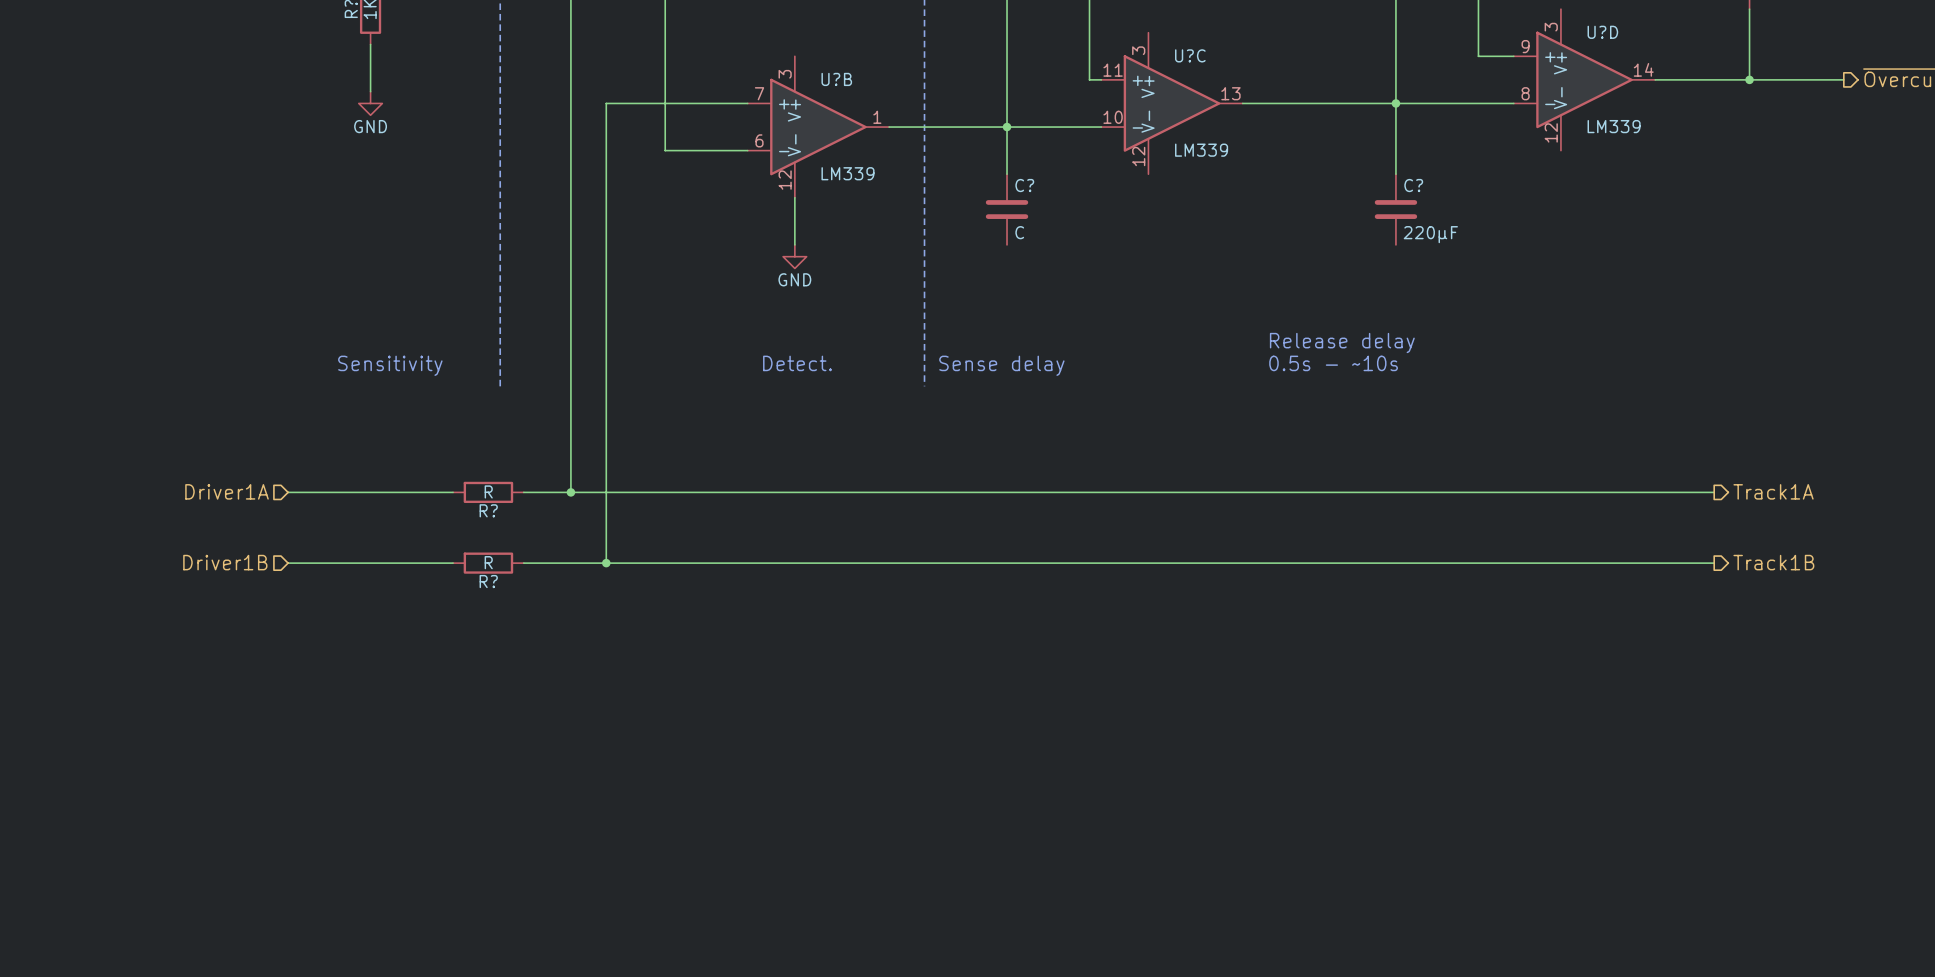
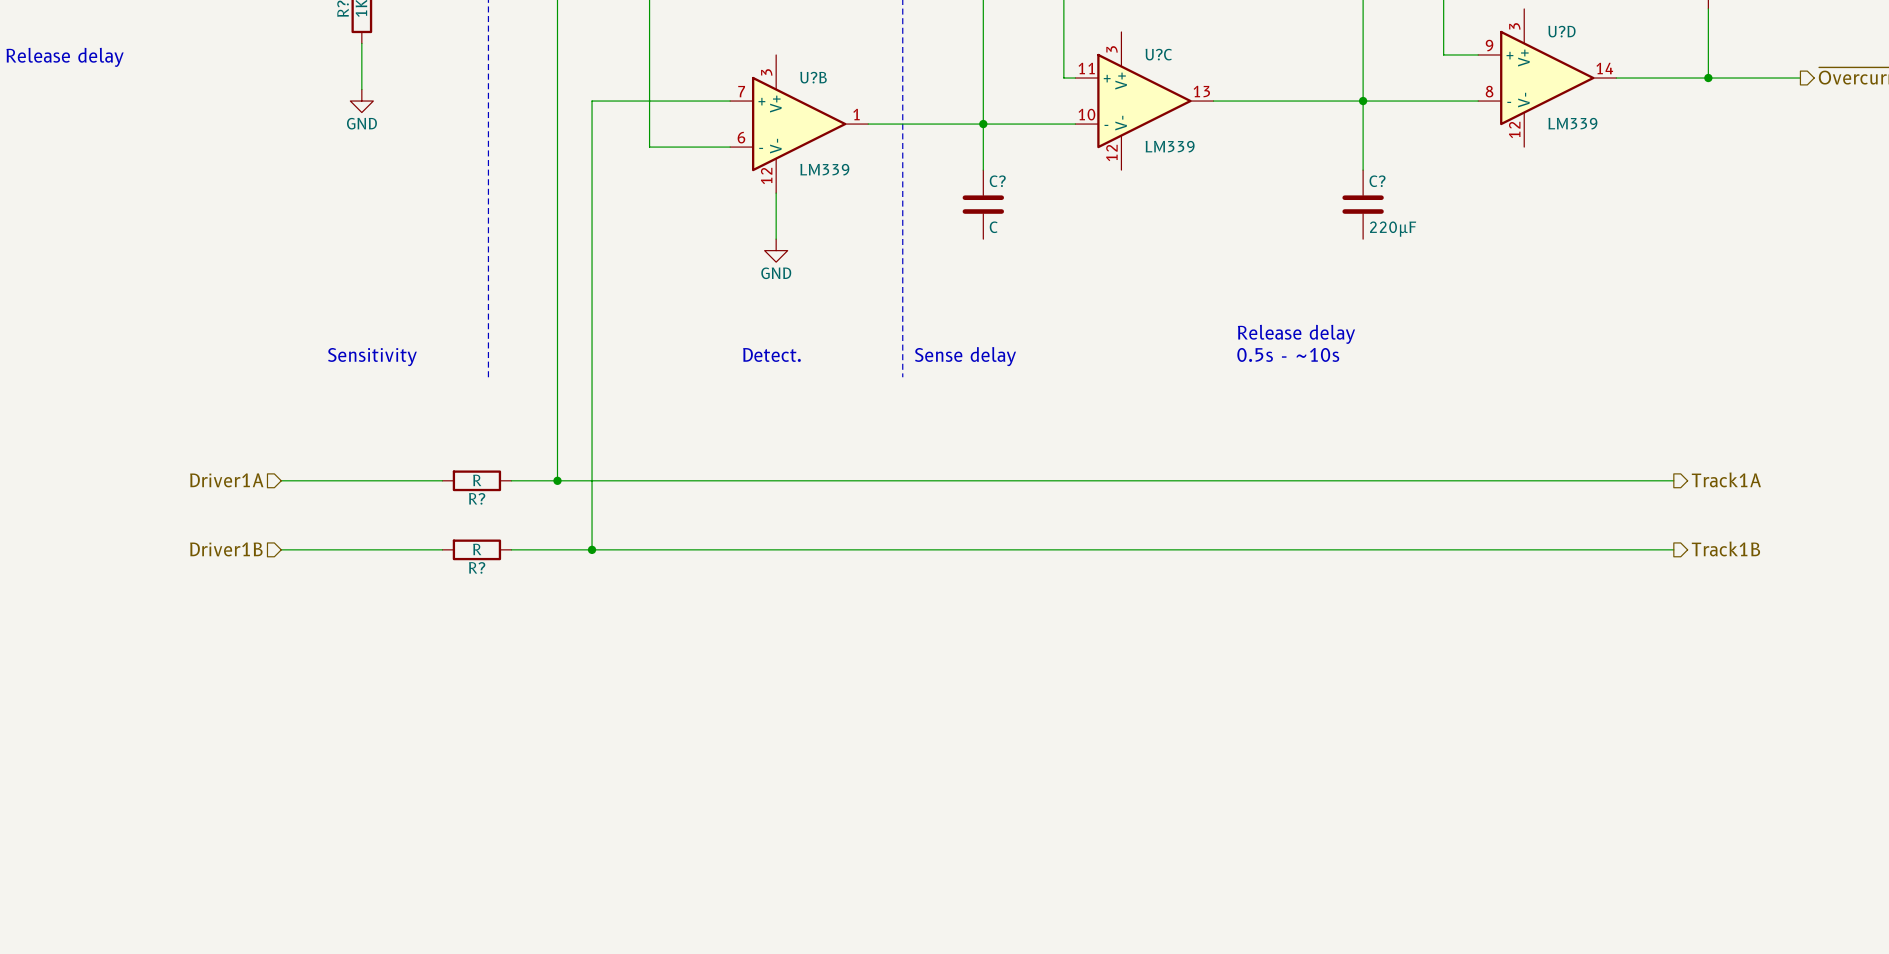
text: none -> Release delay (65, 57)

